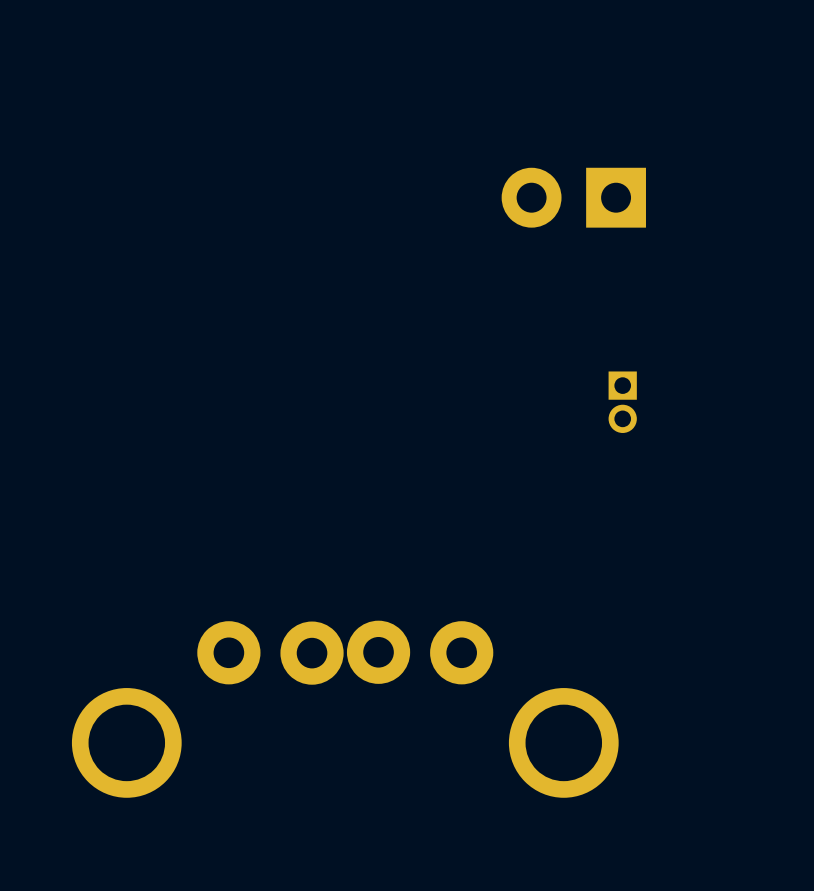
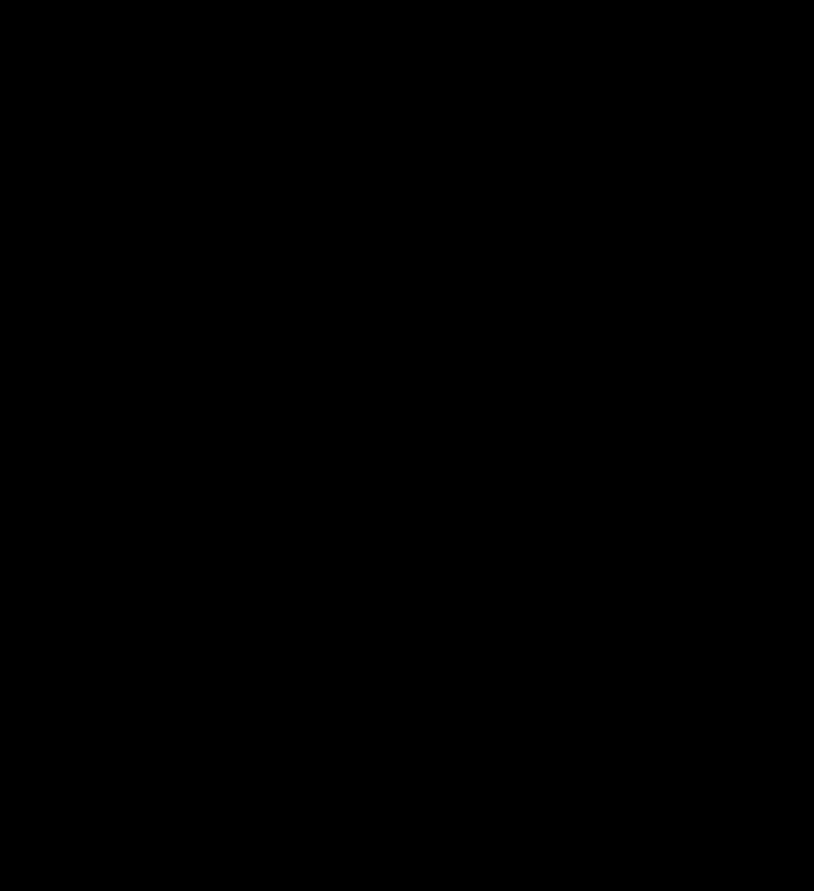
part: (573, 197) -> none
part: (622, 402) -> none
part: (345, 709) -> none

